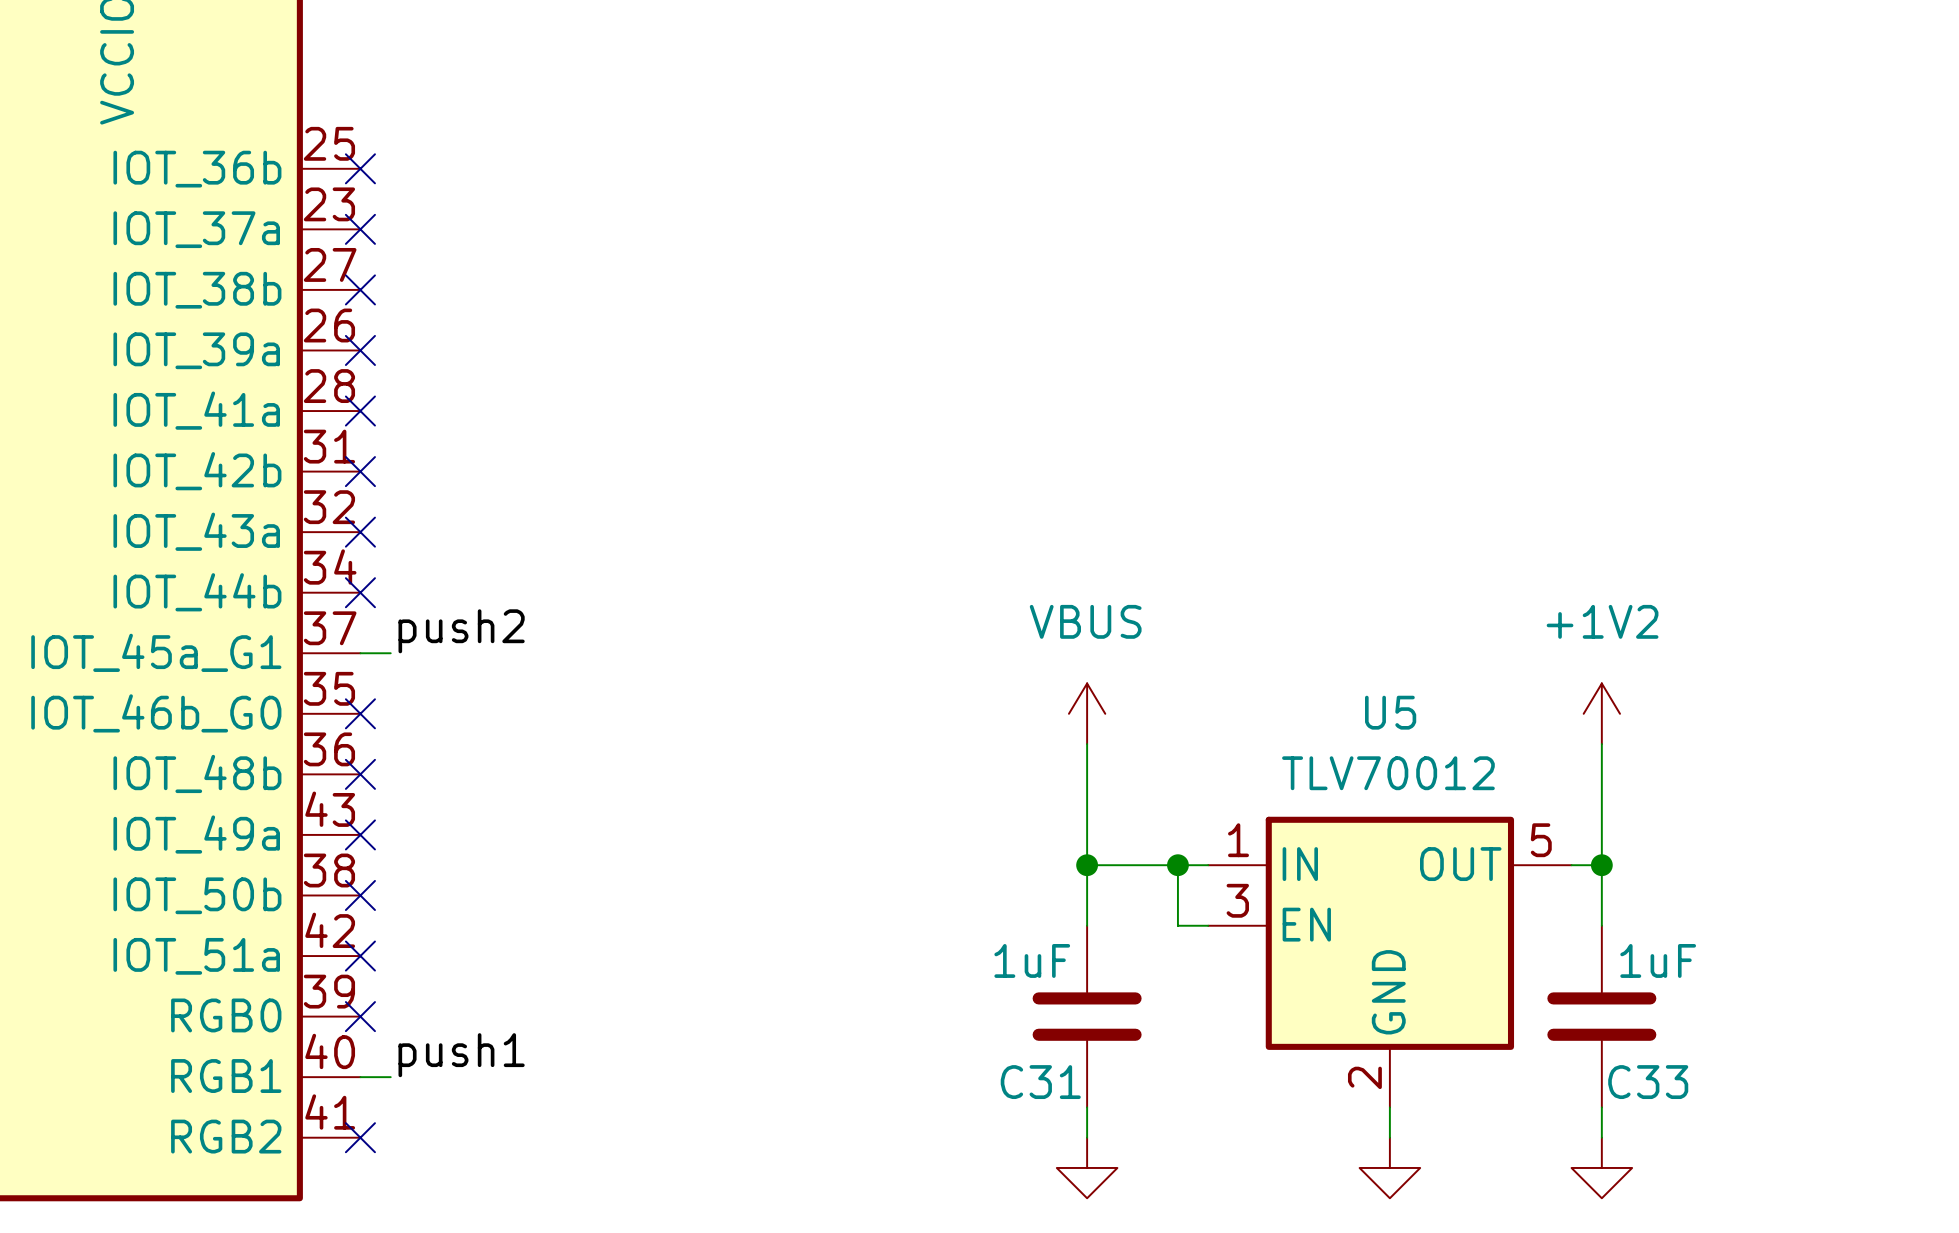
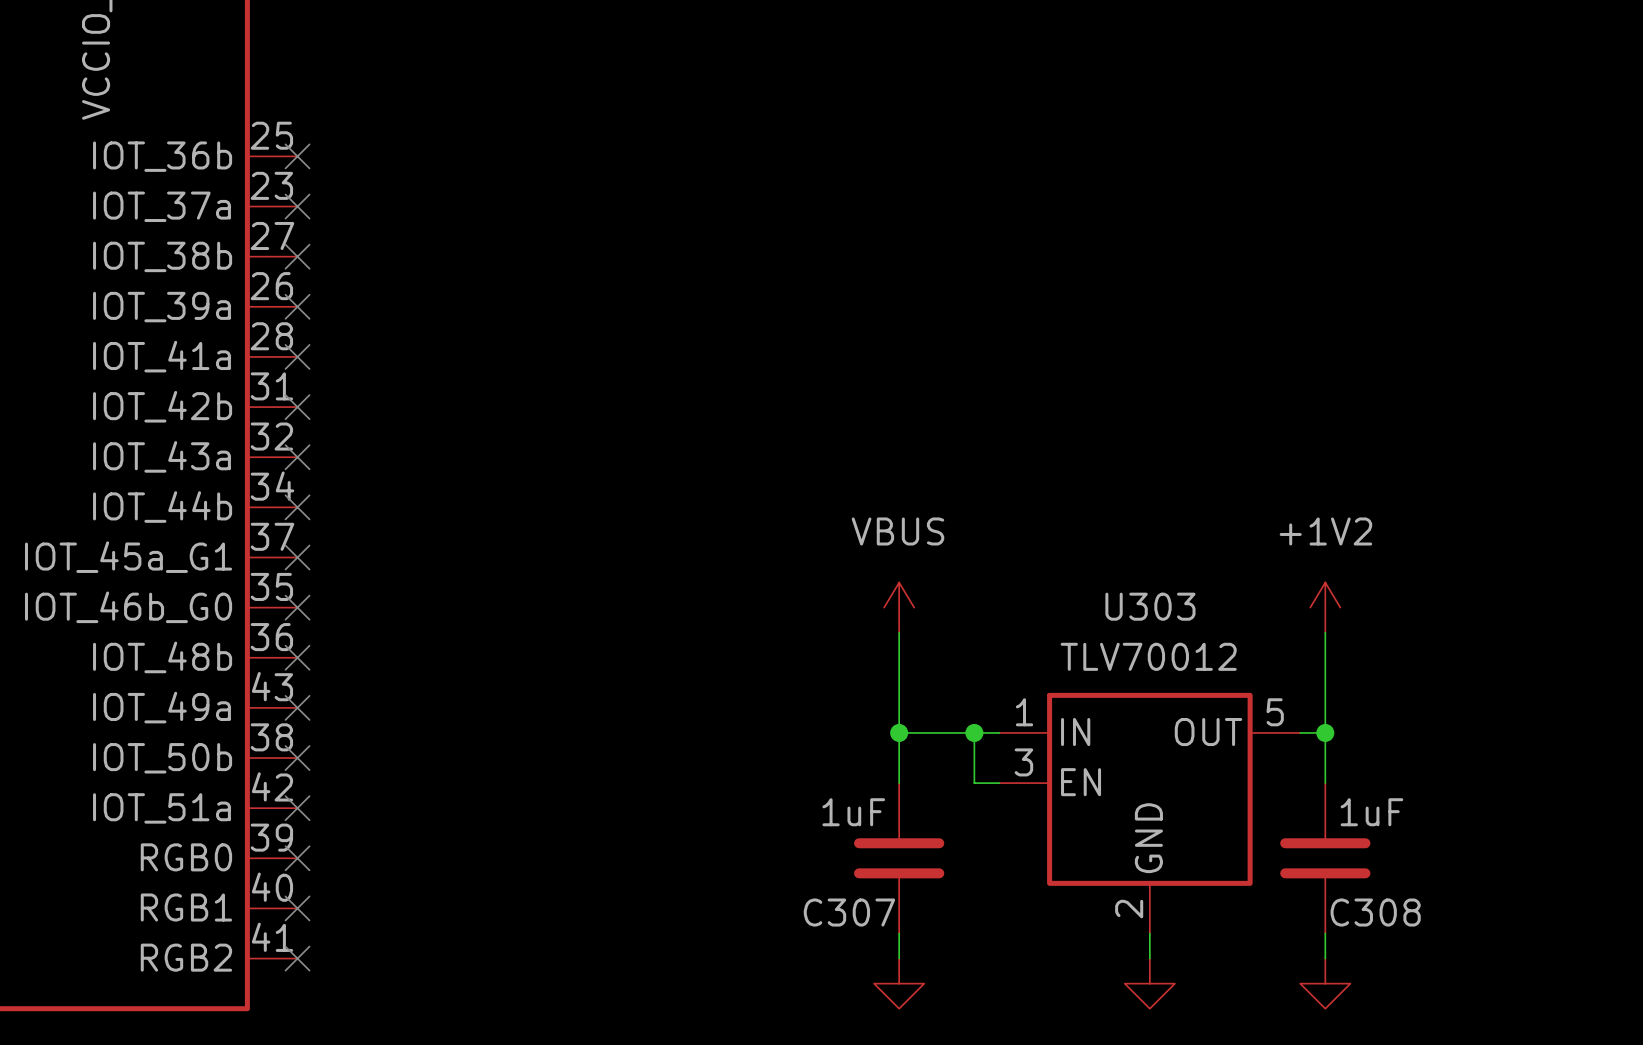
label: push2 (461, 631) -> none
wire: (360, 653) (390, 653) -> none
no-connect mark: none -> (297, 557)
U5 name: U5 (1390, 712) -> U303 (1150, 606)
label: push1 (461, 1055) -> none
wire: (360, 1077) (390, 1077) -> none
no-connect mark: none -> (297, 908)
C31 name: C31 (1040, 1082) -> C307 (849, 912)
C33 name: C33 (1648, 1082) -> C308 (1375, 912)

